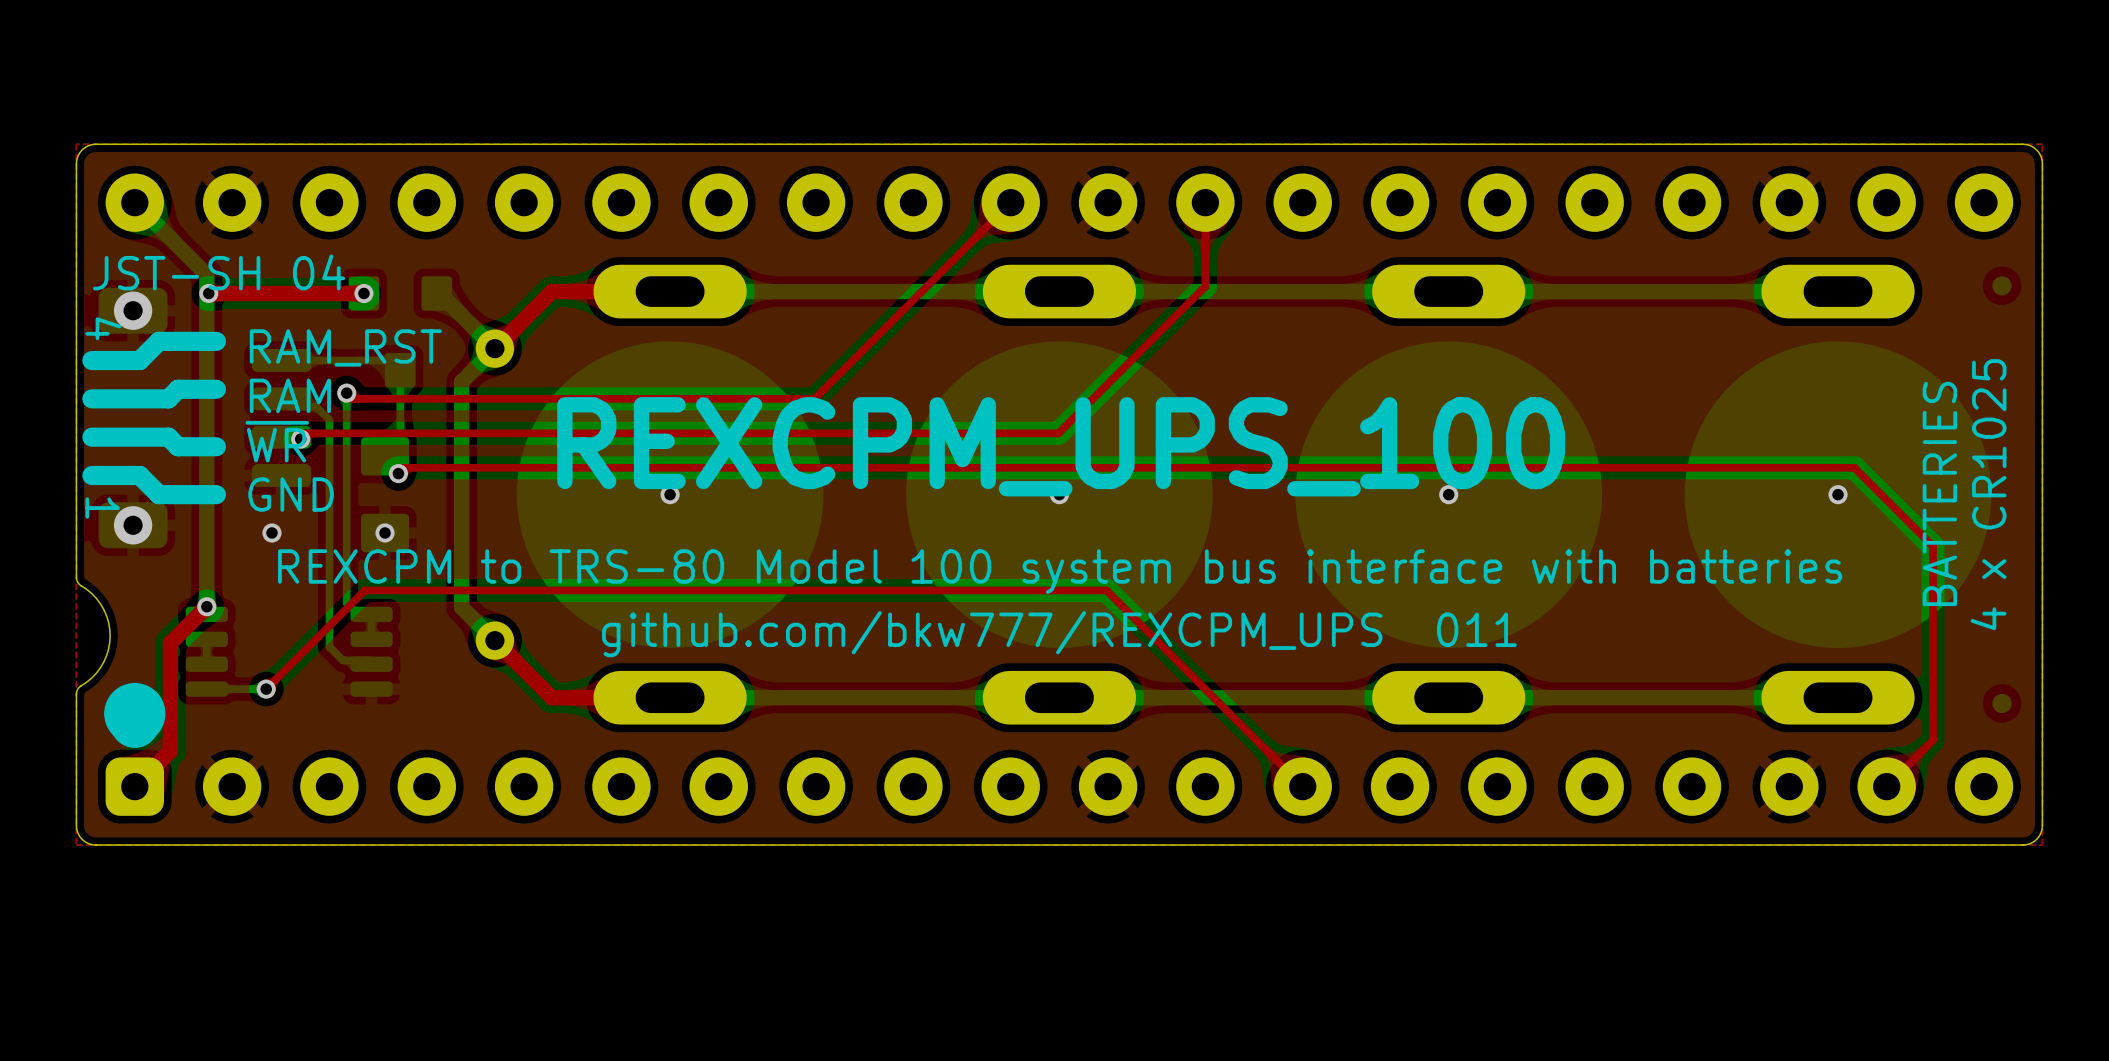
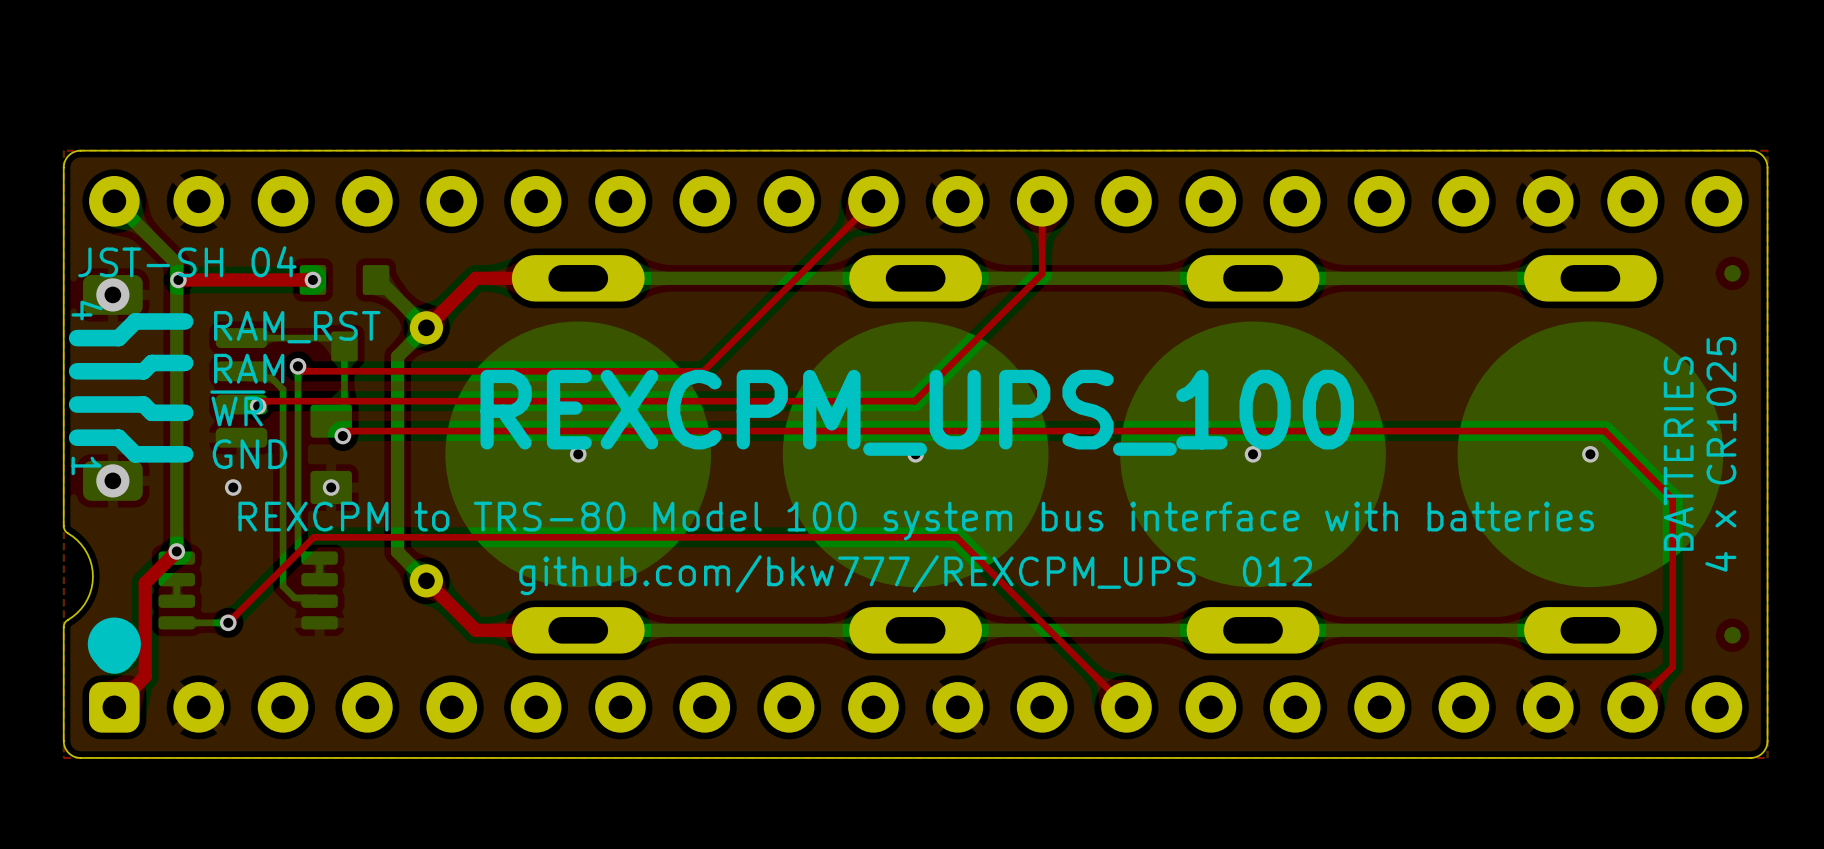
text: github.com/bkw777/REXCPM_UPS 011 (1059, 634) -> github.com/bkw777/REXCPM_UPS 012 (915, 575)

